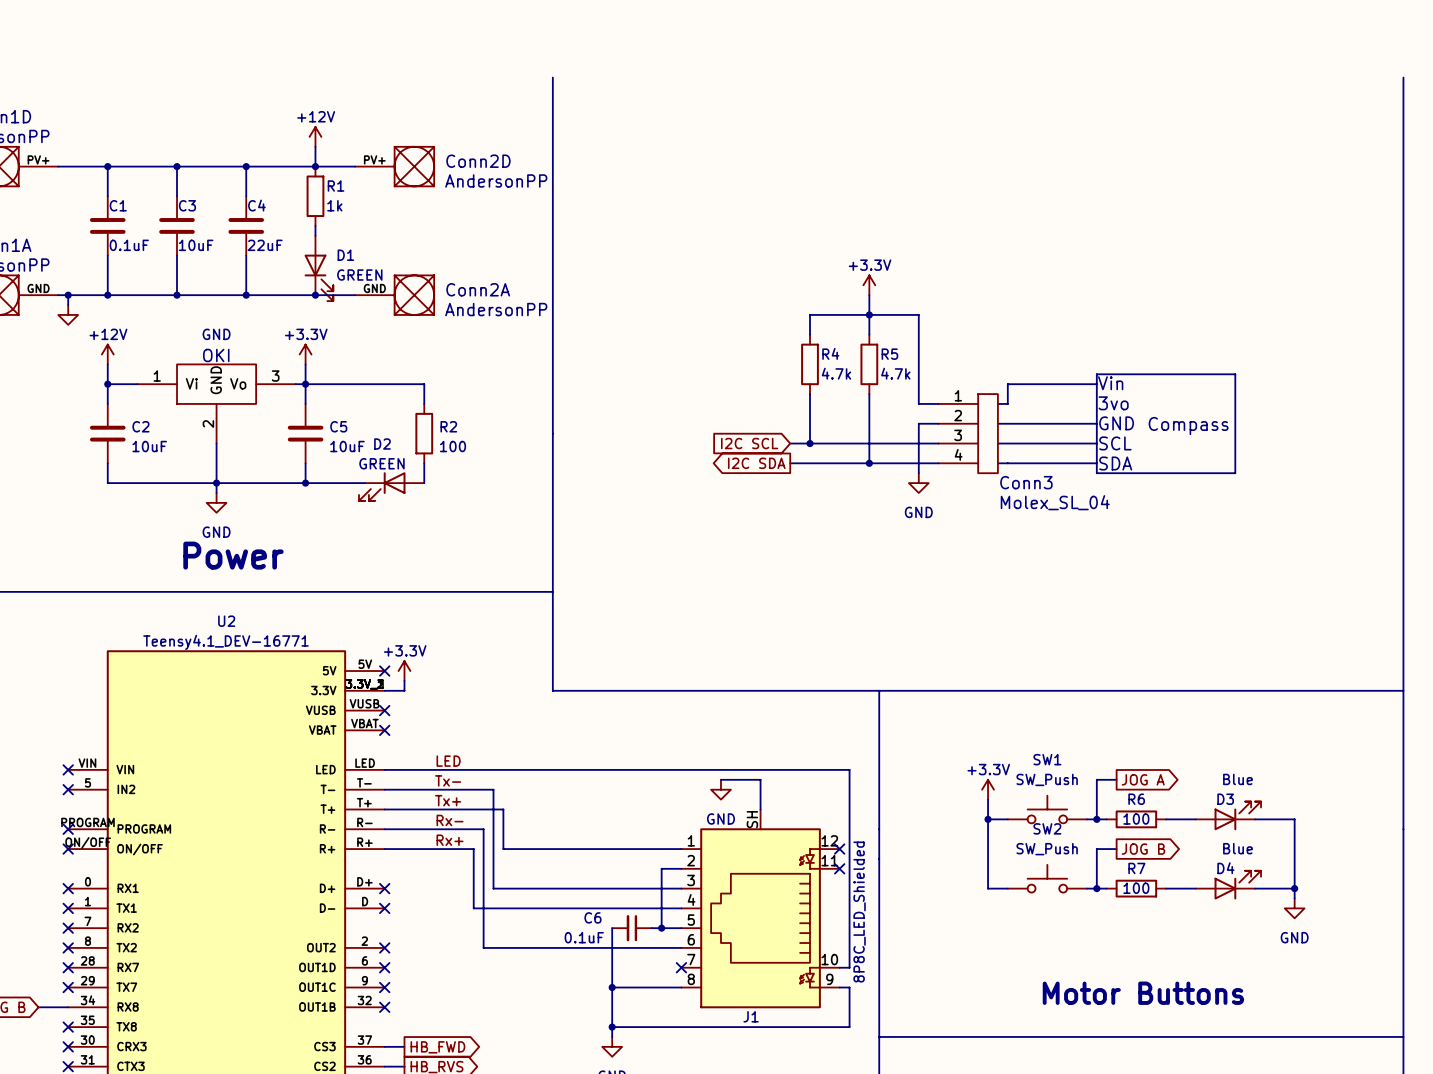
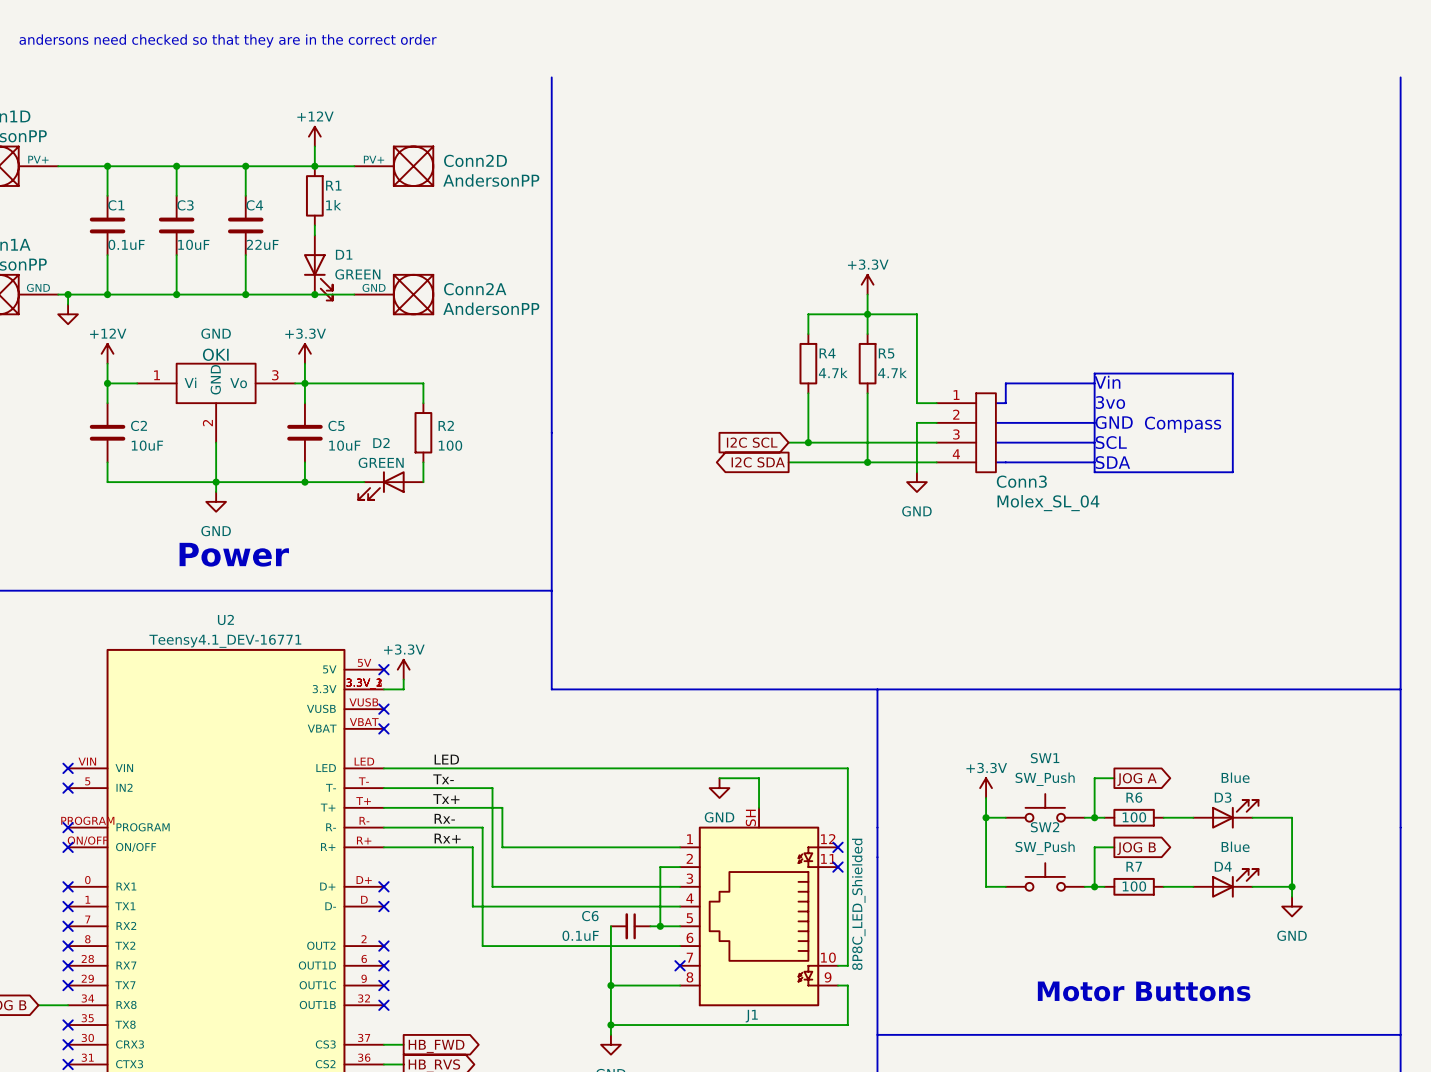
text: none -> andersons need checked so that they are in the correct order (228, 40)

